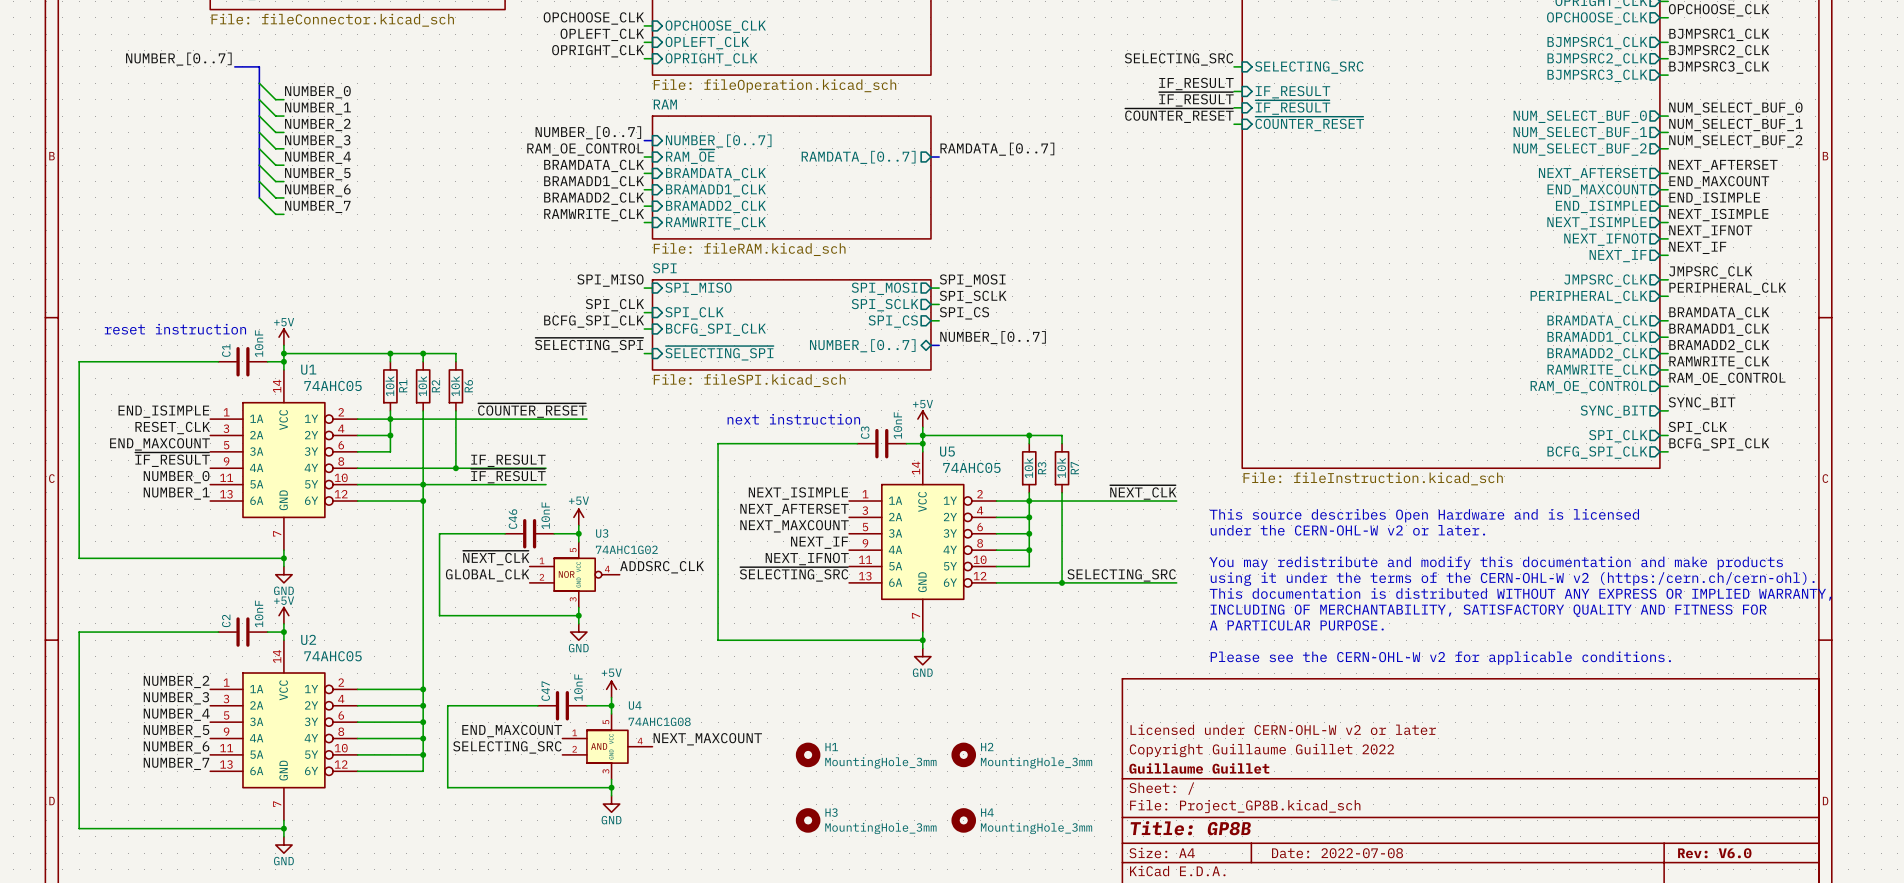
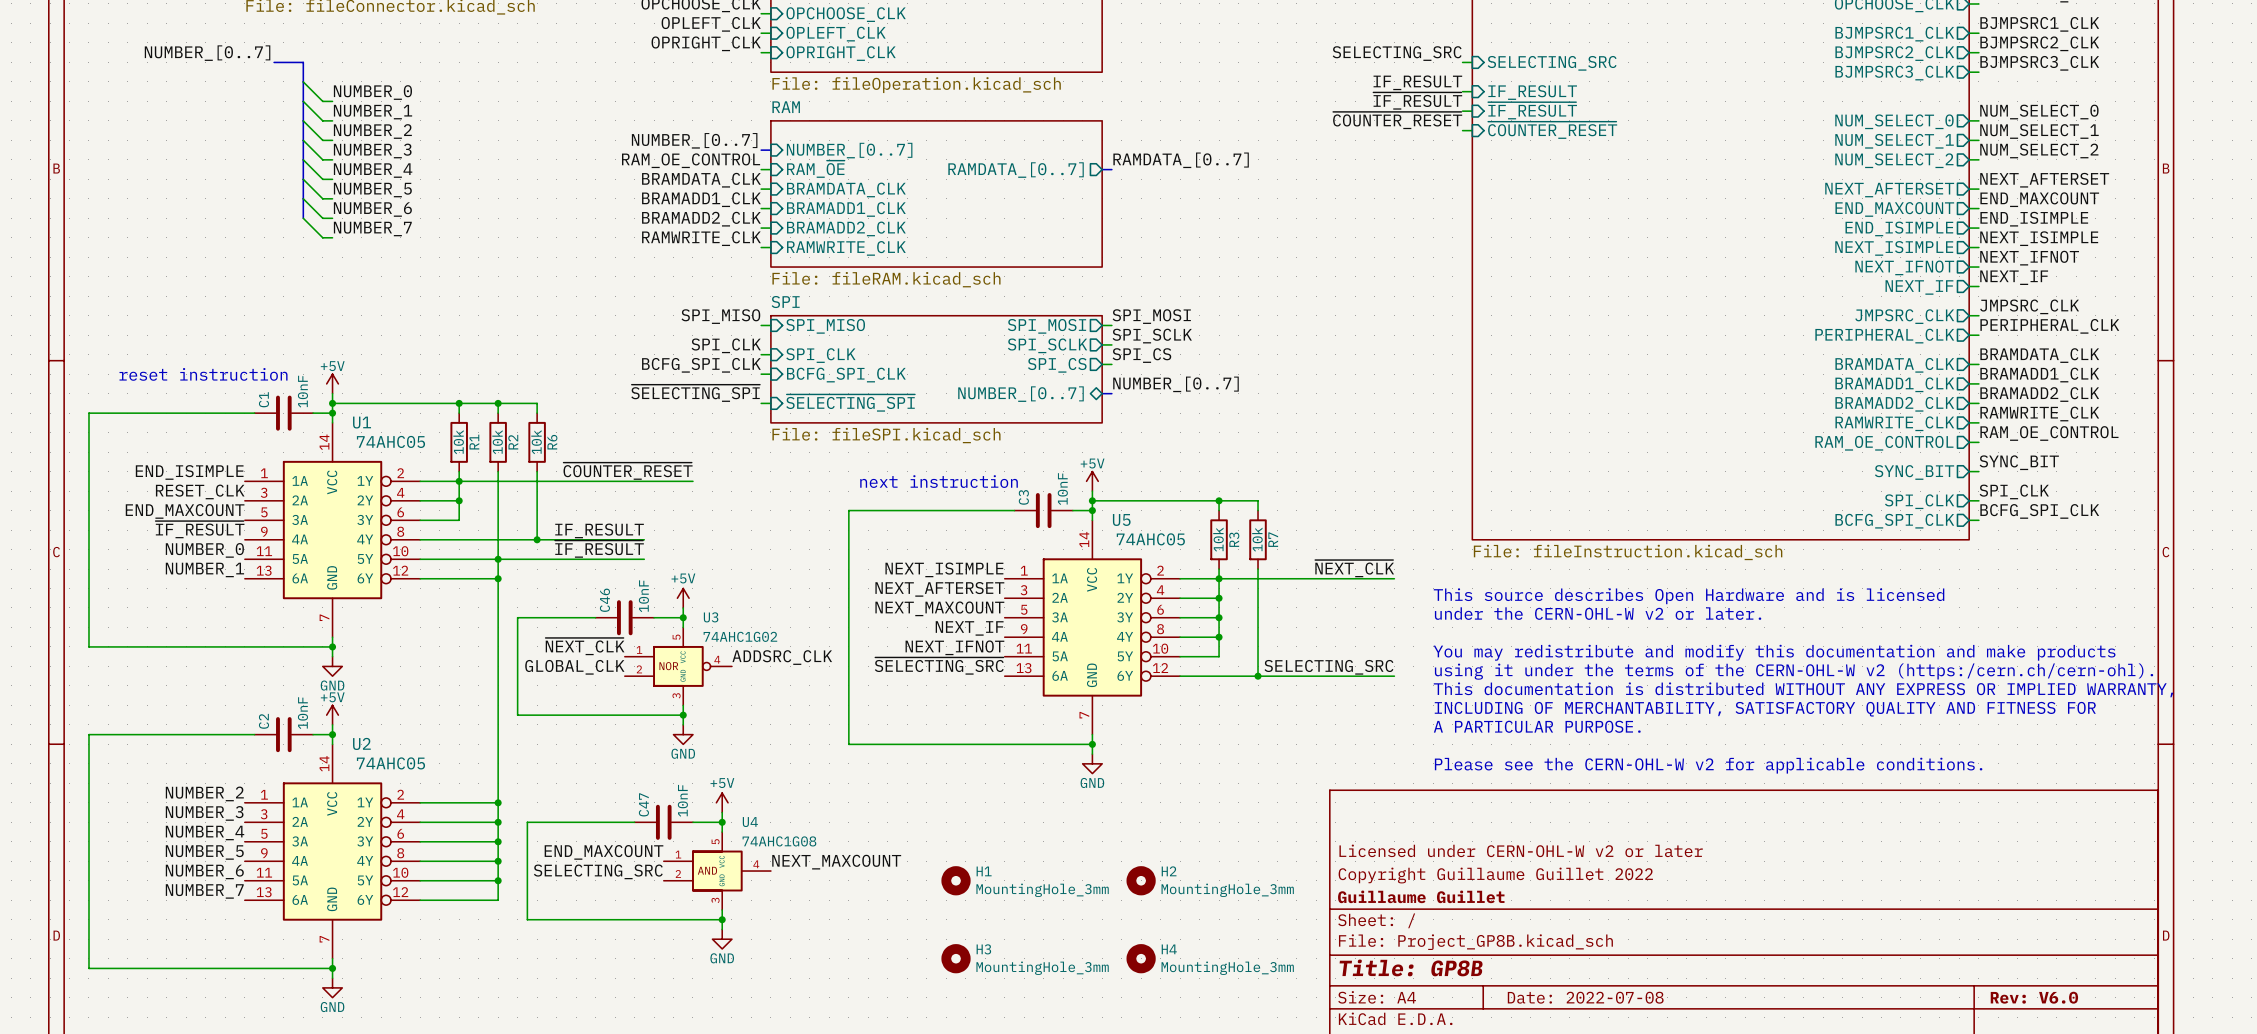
label: NUM_SELECT_BUF_0 (1735, 108) -> NUM_SELECT_0 (2039, 112)
sheet pin: NUM_SELECT_BUF_0 (1580, 116) -> NUM_SELECT_0 (1894, 121)
label: NUM_SELECT_BUF_1 (1735, 124) -> NUM_SELECT_1 (2039, 131)
sheet pin: NUM_SELECT_BUF_1 (1580, 133) -> NUM_SELECT_1 (1894, 141)
label: NUM_SELECT_BUF_2 (1735, 141) -> NUM_SELECT_2 (2039, 150)
sheet pin: NUM_SELECT_BUF_2 (1580, 149) -> NUM_SELECT_2 (1894, 160)

